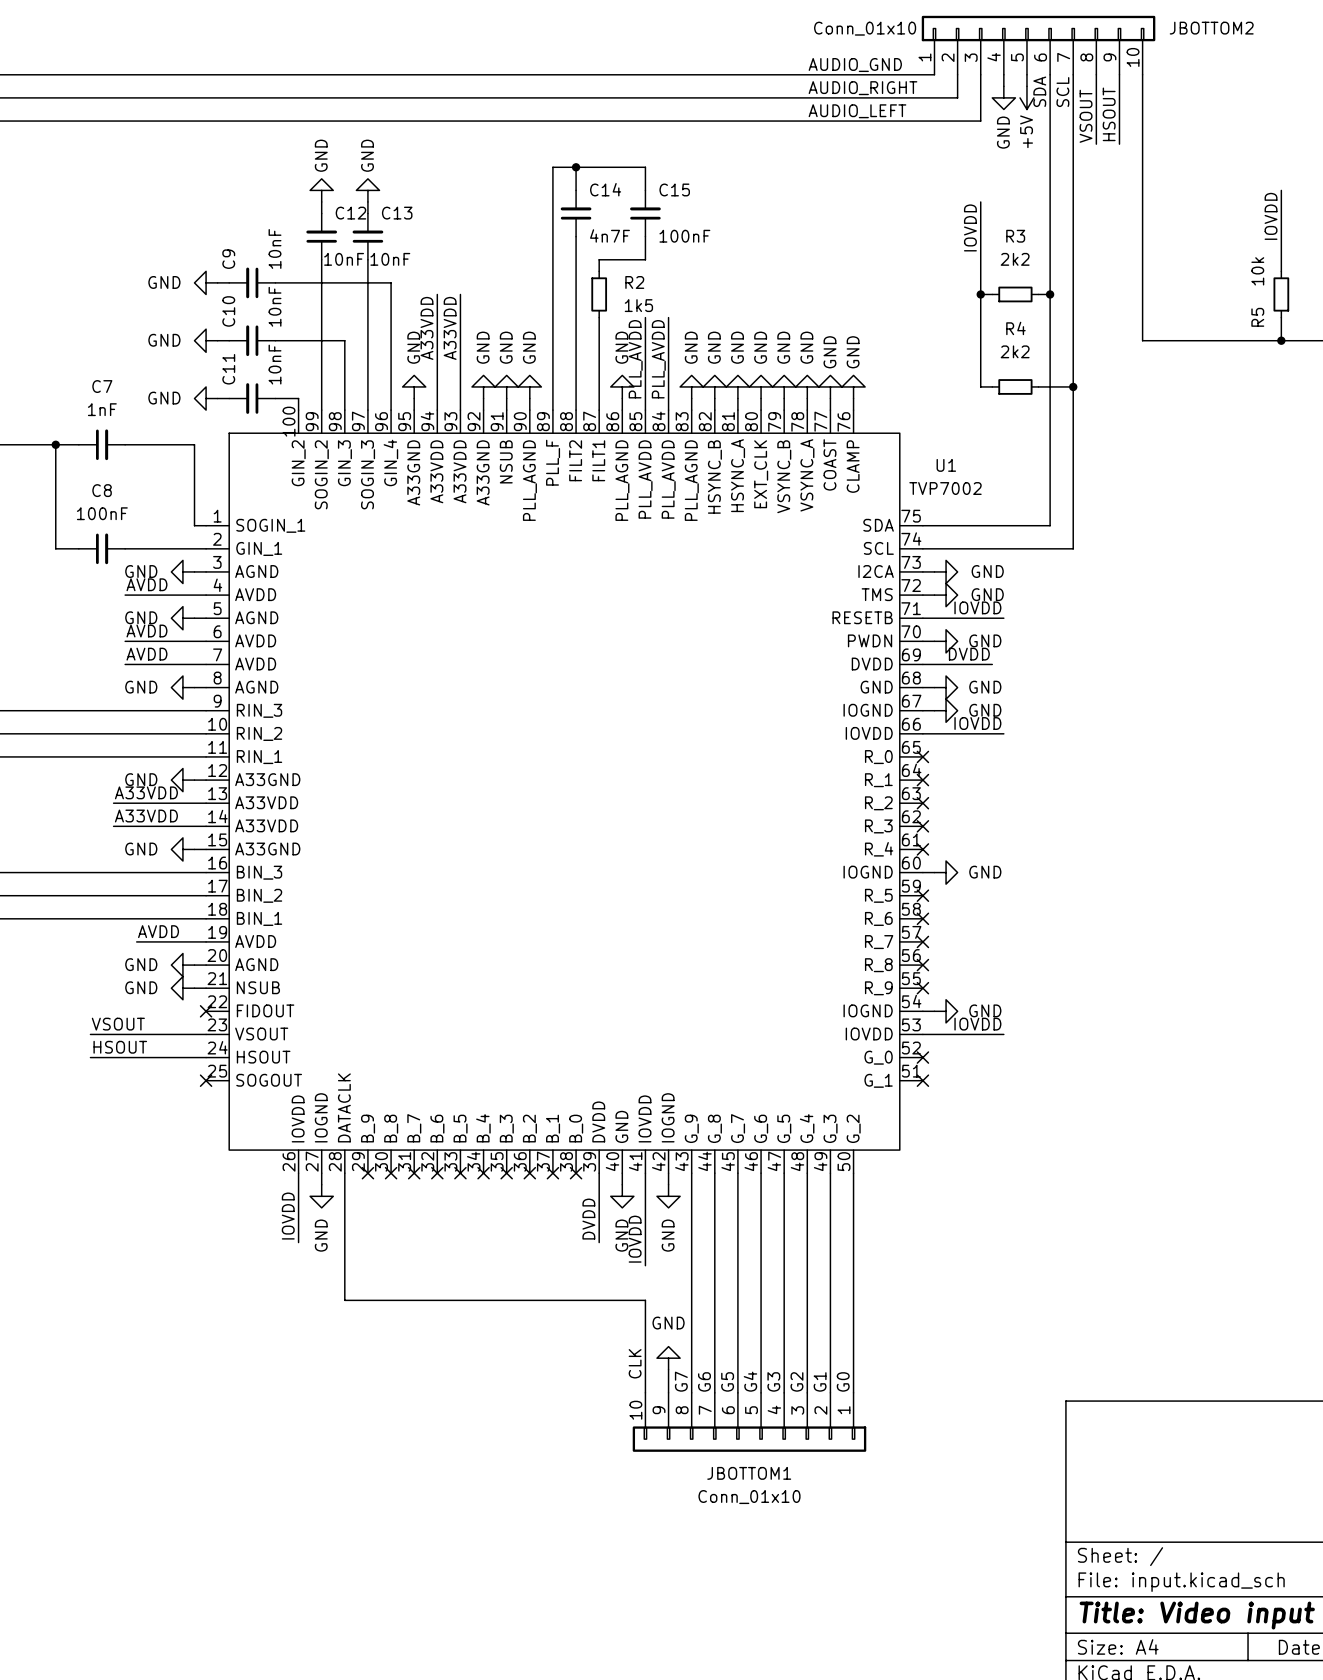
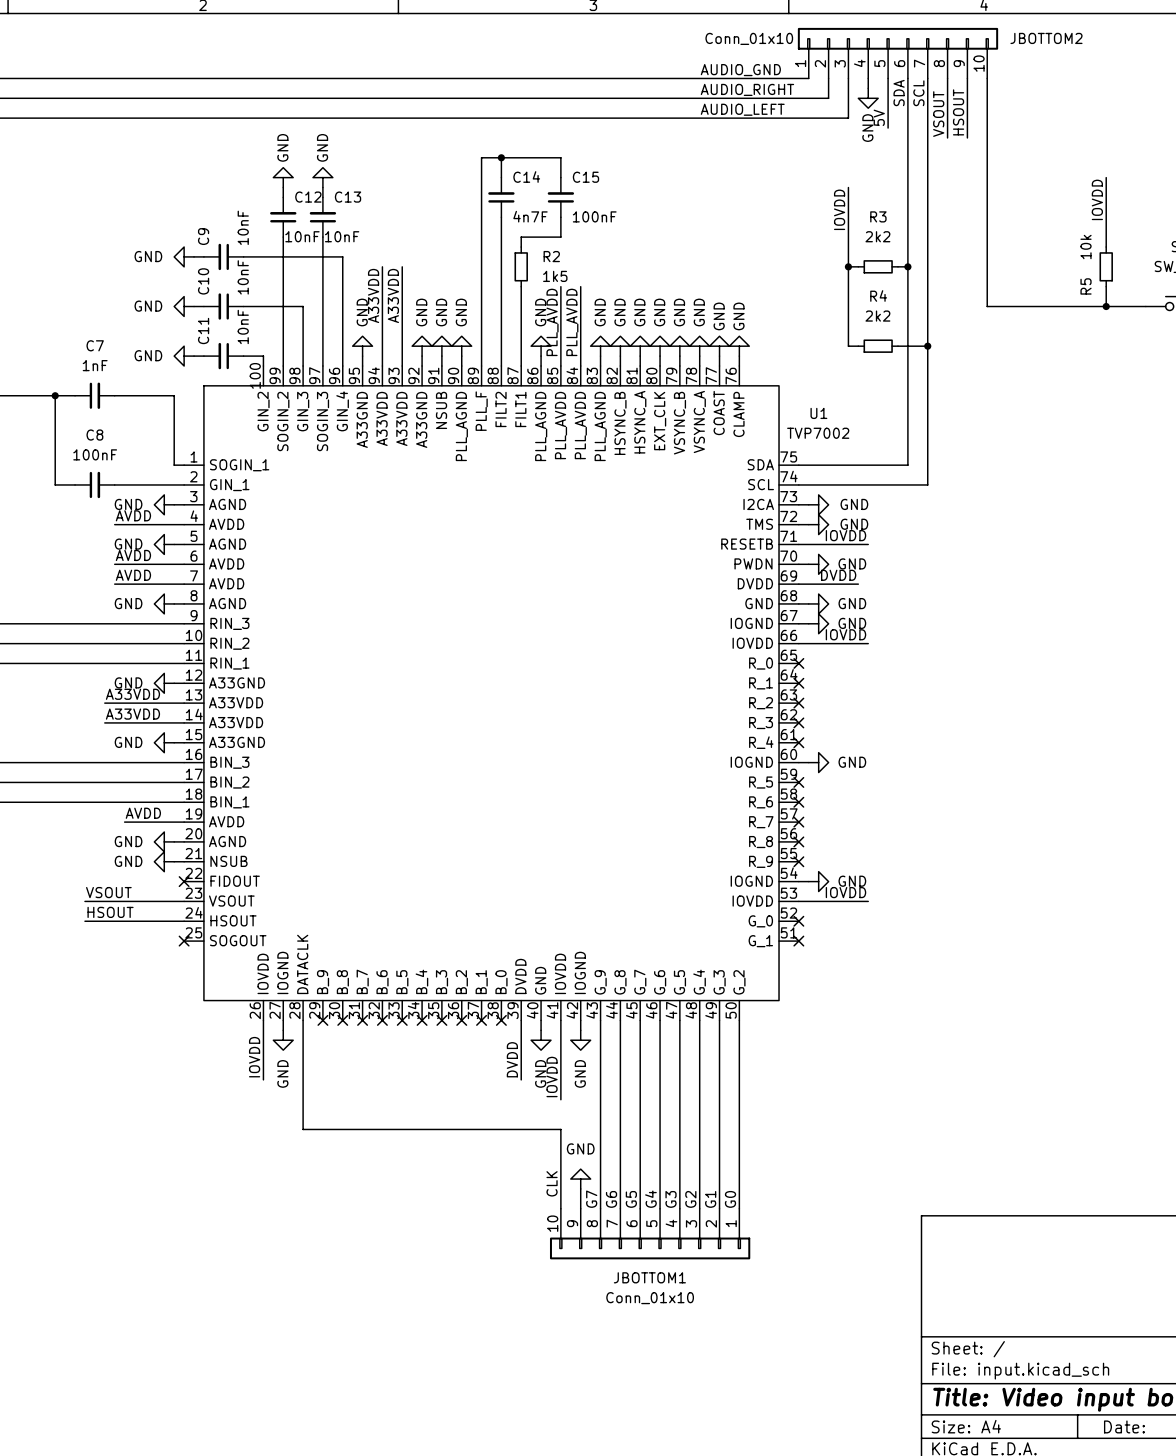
power symbol: +5V (1026, 97) -> none
label: none -> 5V (879, 117)

